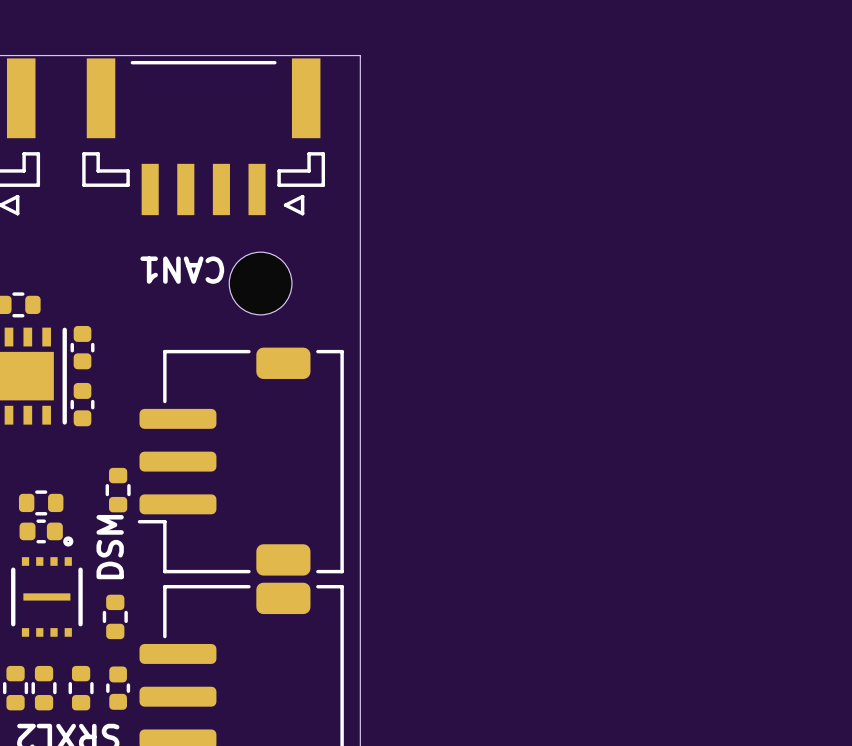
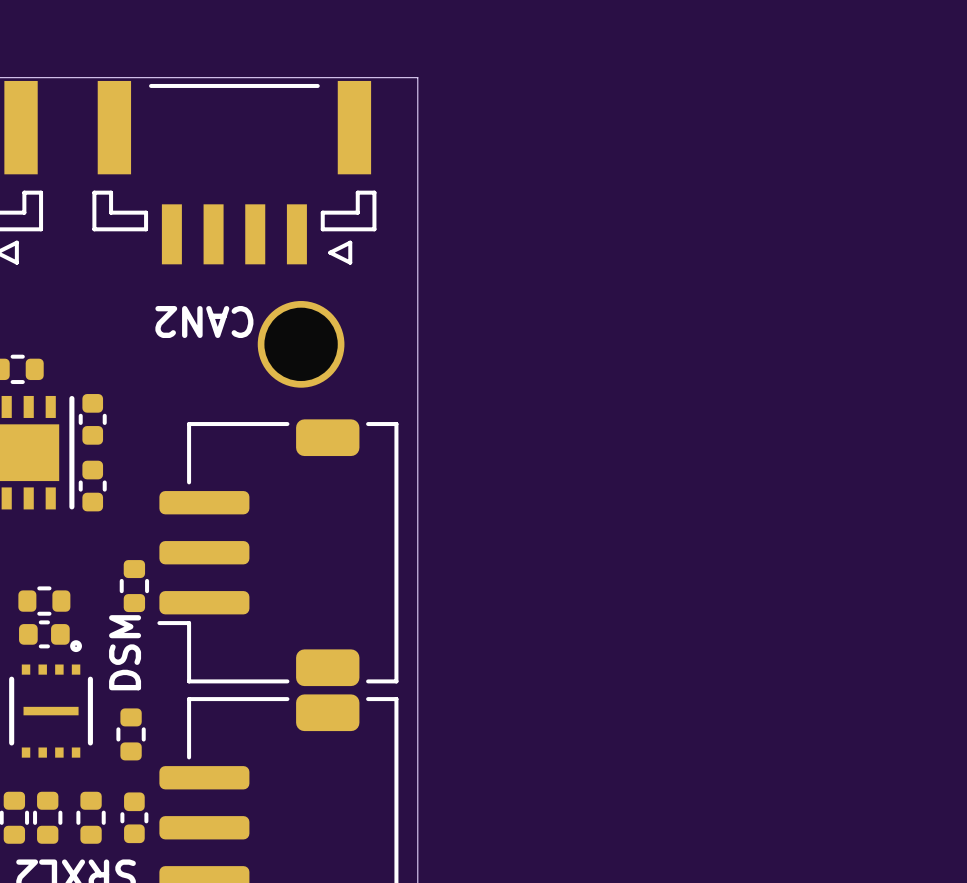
part footprint: [229, 252, 292, 315] -> [257, 301, 345, 388]
text: CAN1 (182, 270) -> CAN2 (204, 322)

